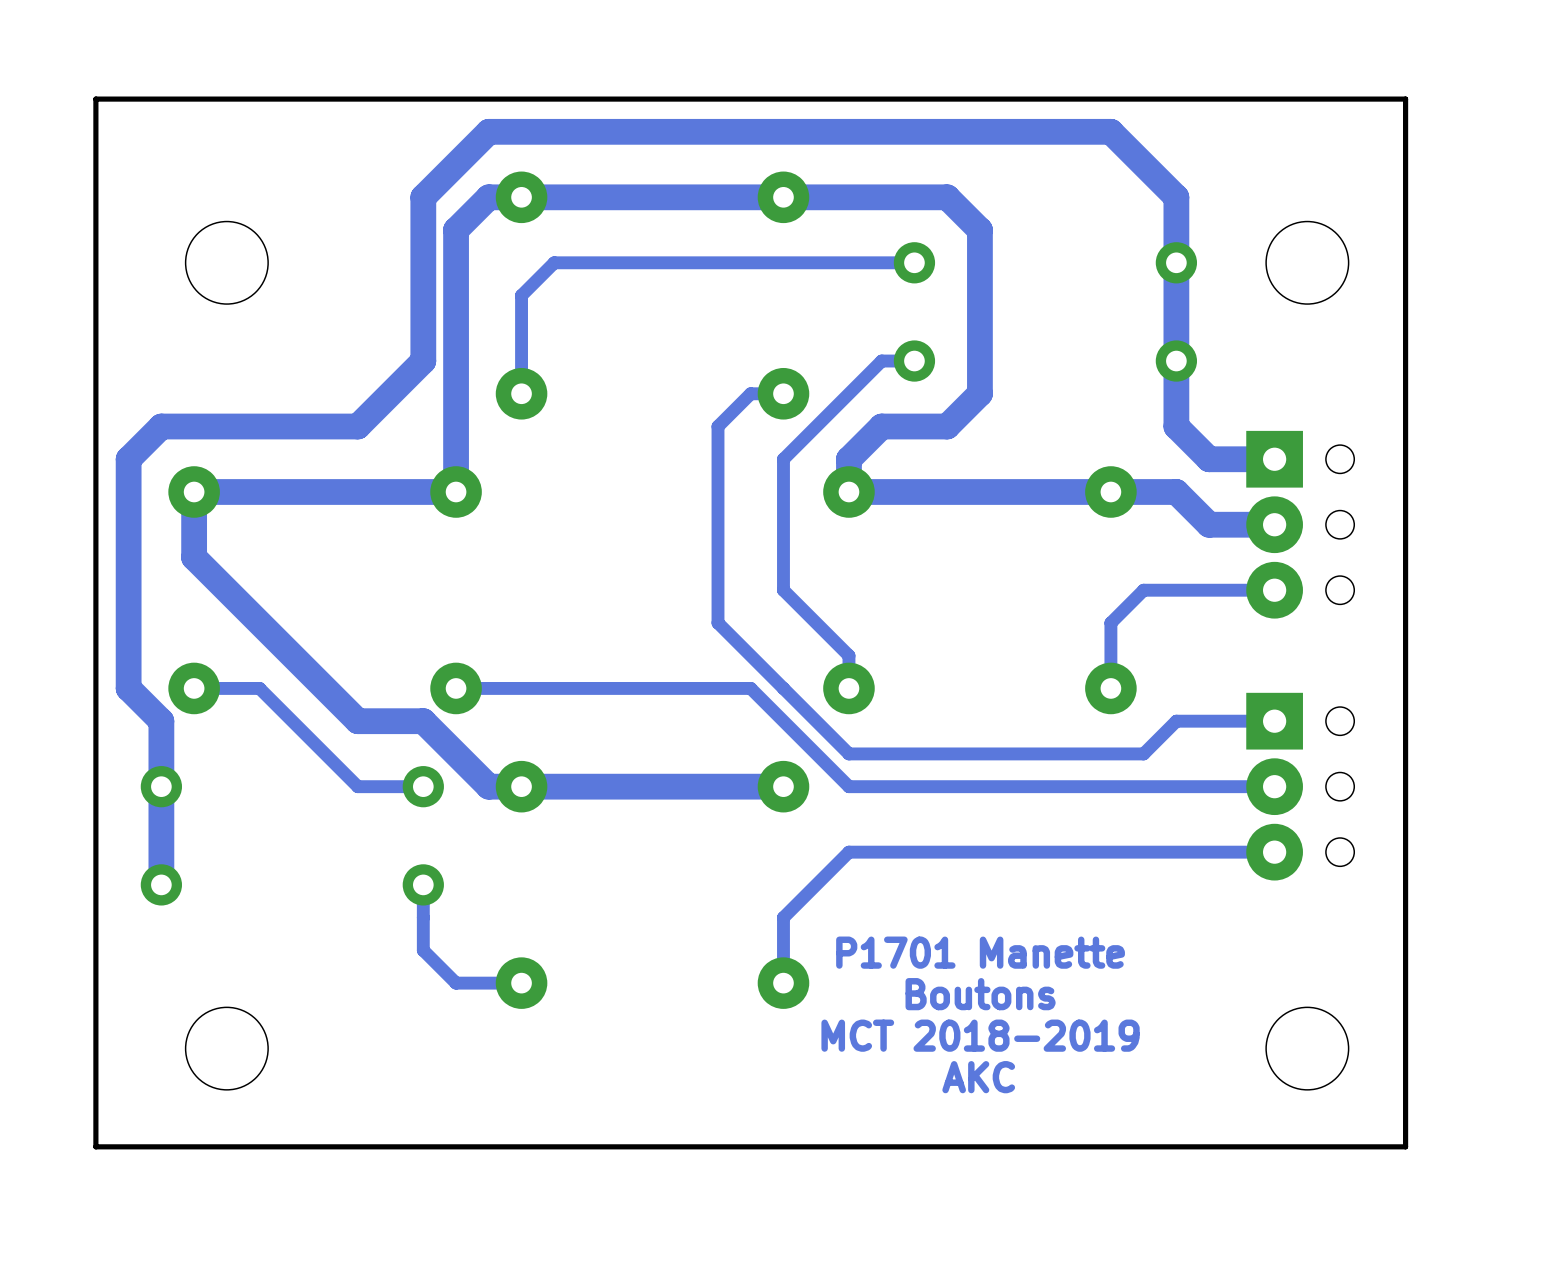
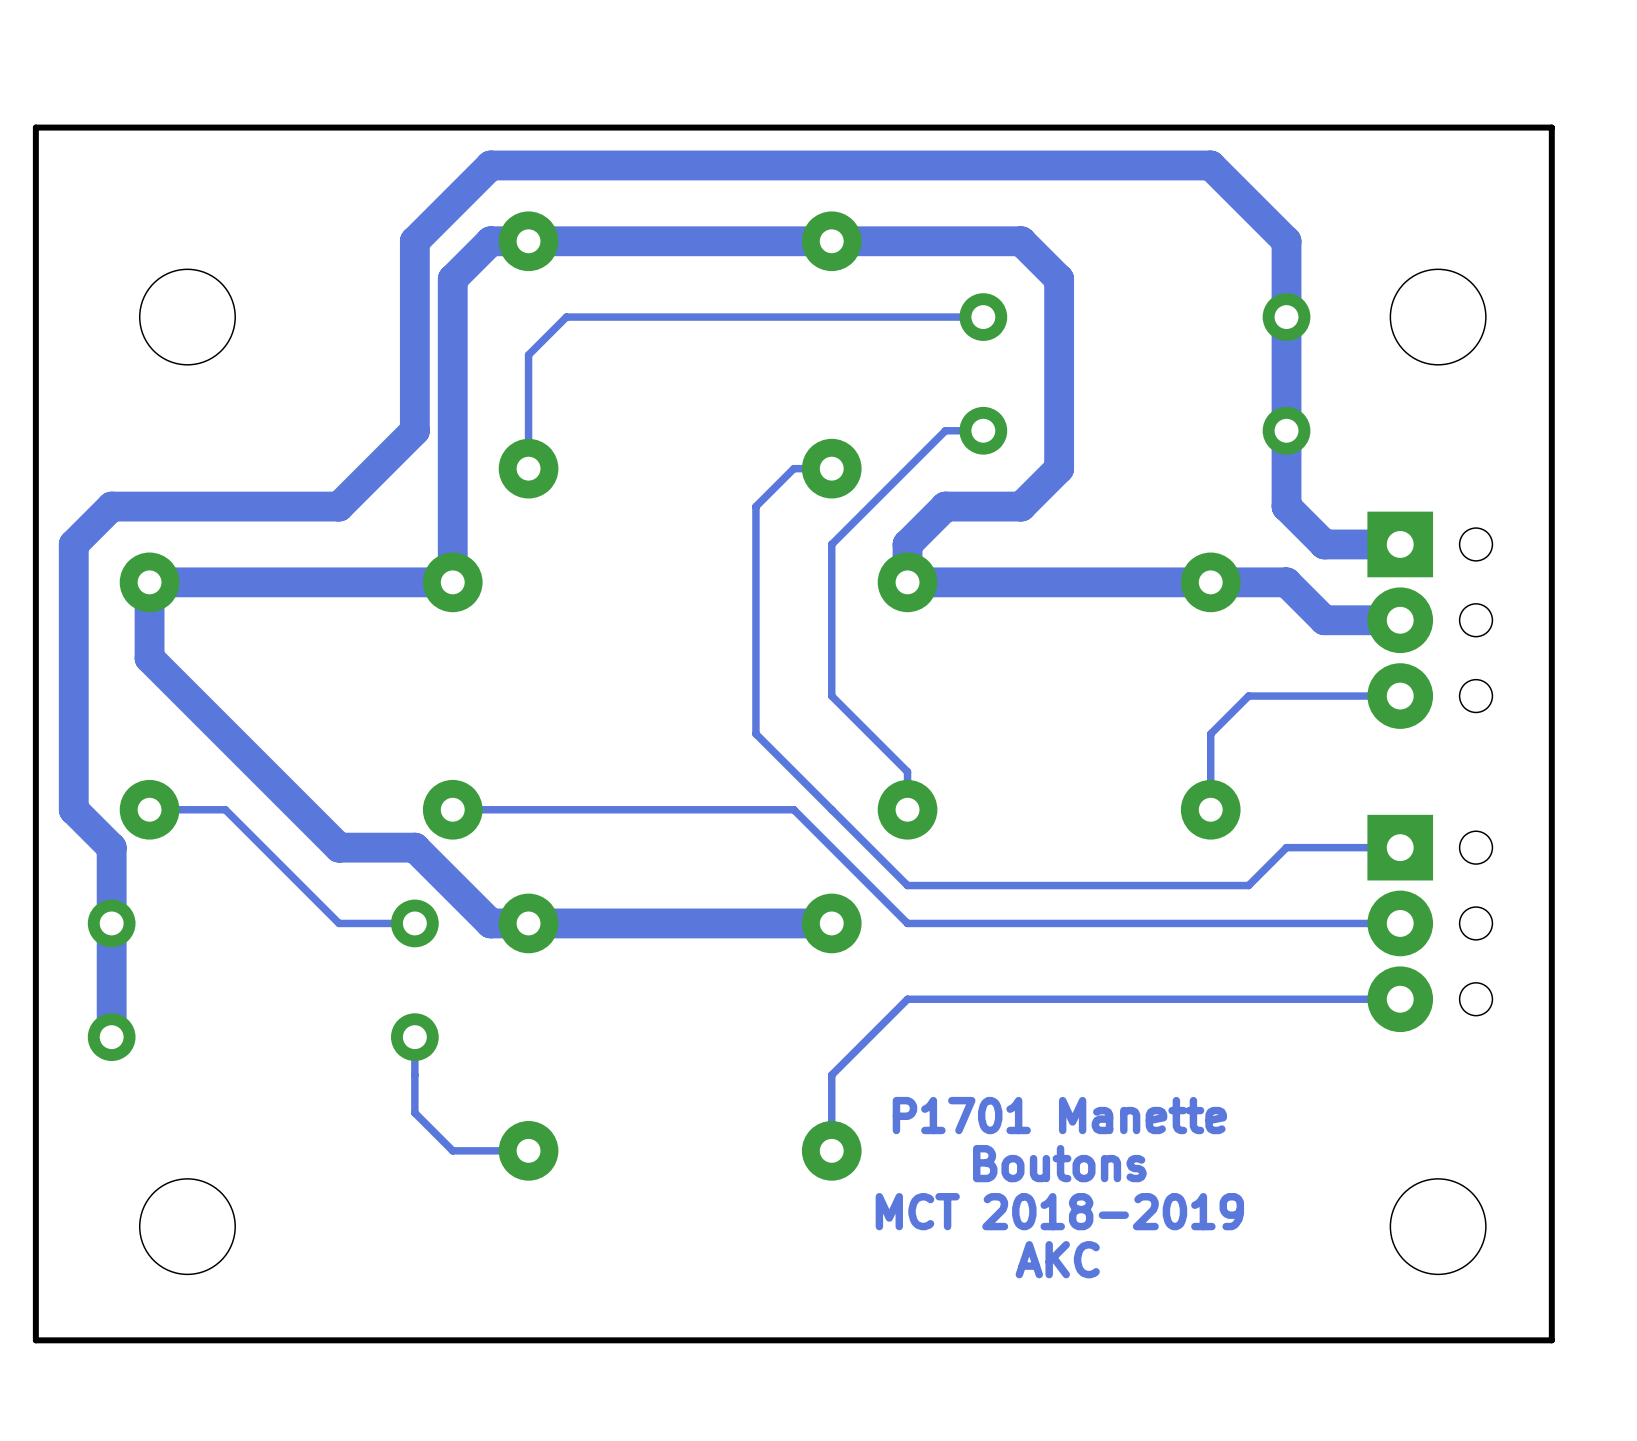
track width: thick (914, 262) (554, 262) (521, 295) (521, 393) -> thin (983, 317) (566, 317) (528, 354) (528, 468)
track width: thick (914, 361) (881, 361) (783, 459) (783, 590) (848, 655) (848, 688) -> thin (983, 430) (945, 430) (831, 544) (831, 696) (907, 771) (907, 809)
track width: thick (783, 393) (750, 393) (718, 426) (718, 622) (848, 753) (1143, 753) (1176, 721) (1274, 721) -> thin (831, 468) (793, 468) (755, 506) (755, 733) (907, 885) (1248, 885) (1286, 847) (1400, 847)
track width: thick (1274, 590) (1143, 590) (1110, 622) (1110, 688) -> thin (1400, 696) (1248, 696) (1210, 733) (1210, 809)
track width: thick (194, 688) (259, 688) (357, 786) (423, 786) -> thin (149, 809) (225, 809) (339, 923) (414, 923)
track width: thick (456, 688) (750, 688) (848, 786) (1274, 786) -> thin (452, 809) (793, 809) (907, 923) (1400, 923)
track width: thick (1274, 852) (848, 852) (783, 917) (783, 983) -> thin (1400, 999) (907, 999) (831, 1075) (831, 1150)
track width: thick (423, 884) (423, 950) (456, 983) (521, 983) -> thin (414, 1037) (414, 1112) (452, 1150) (528, 1150)

